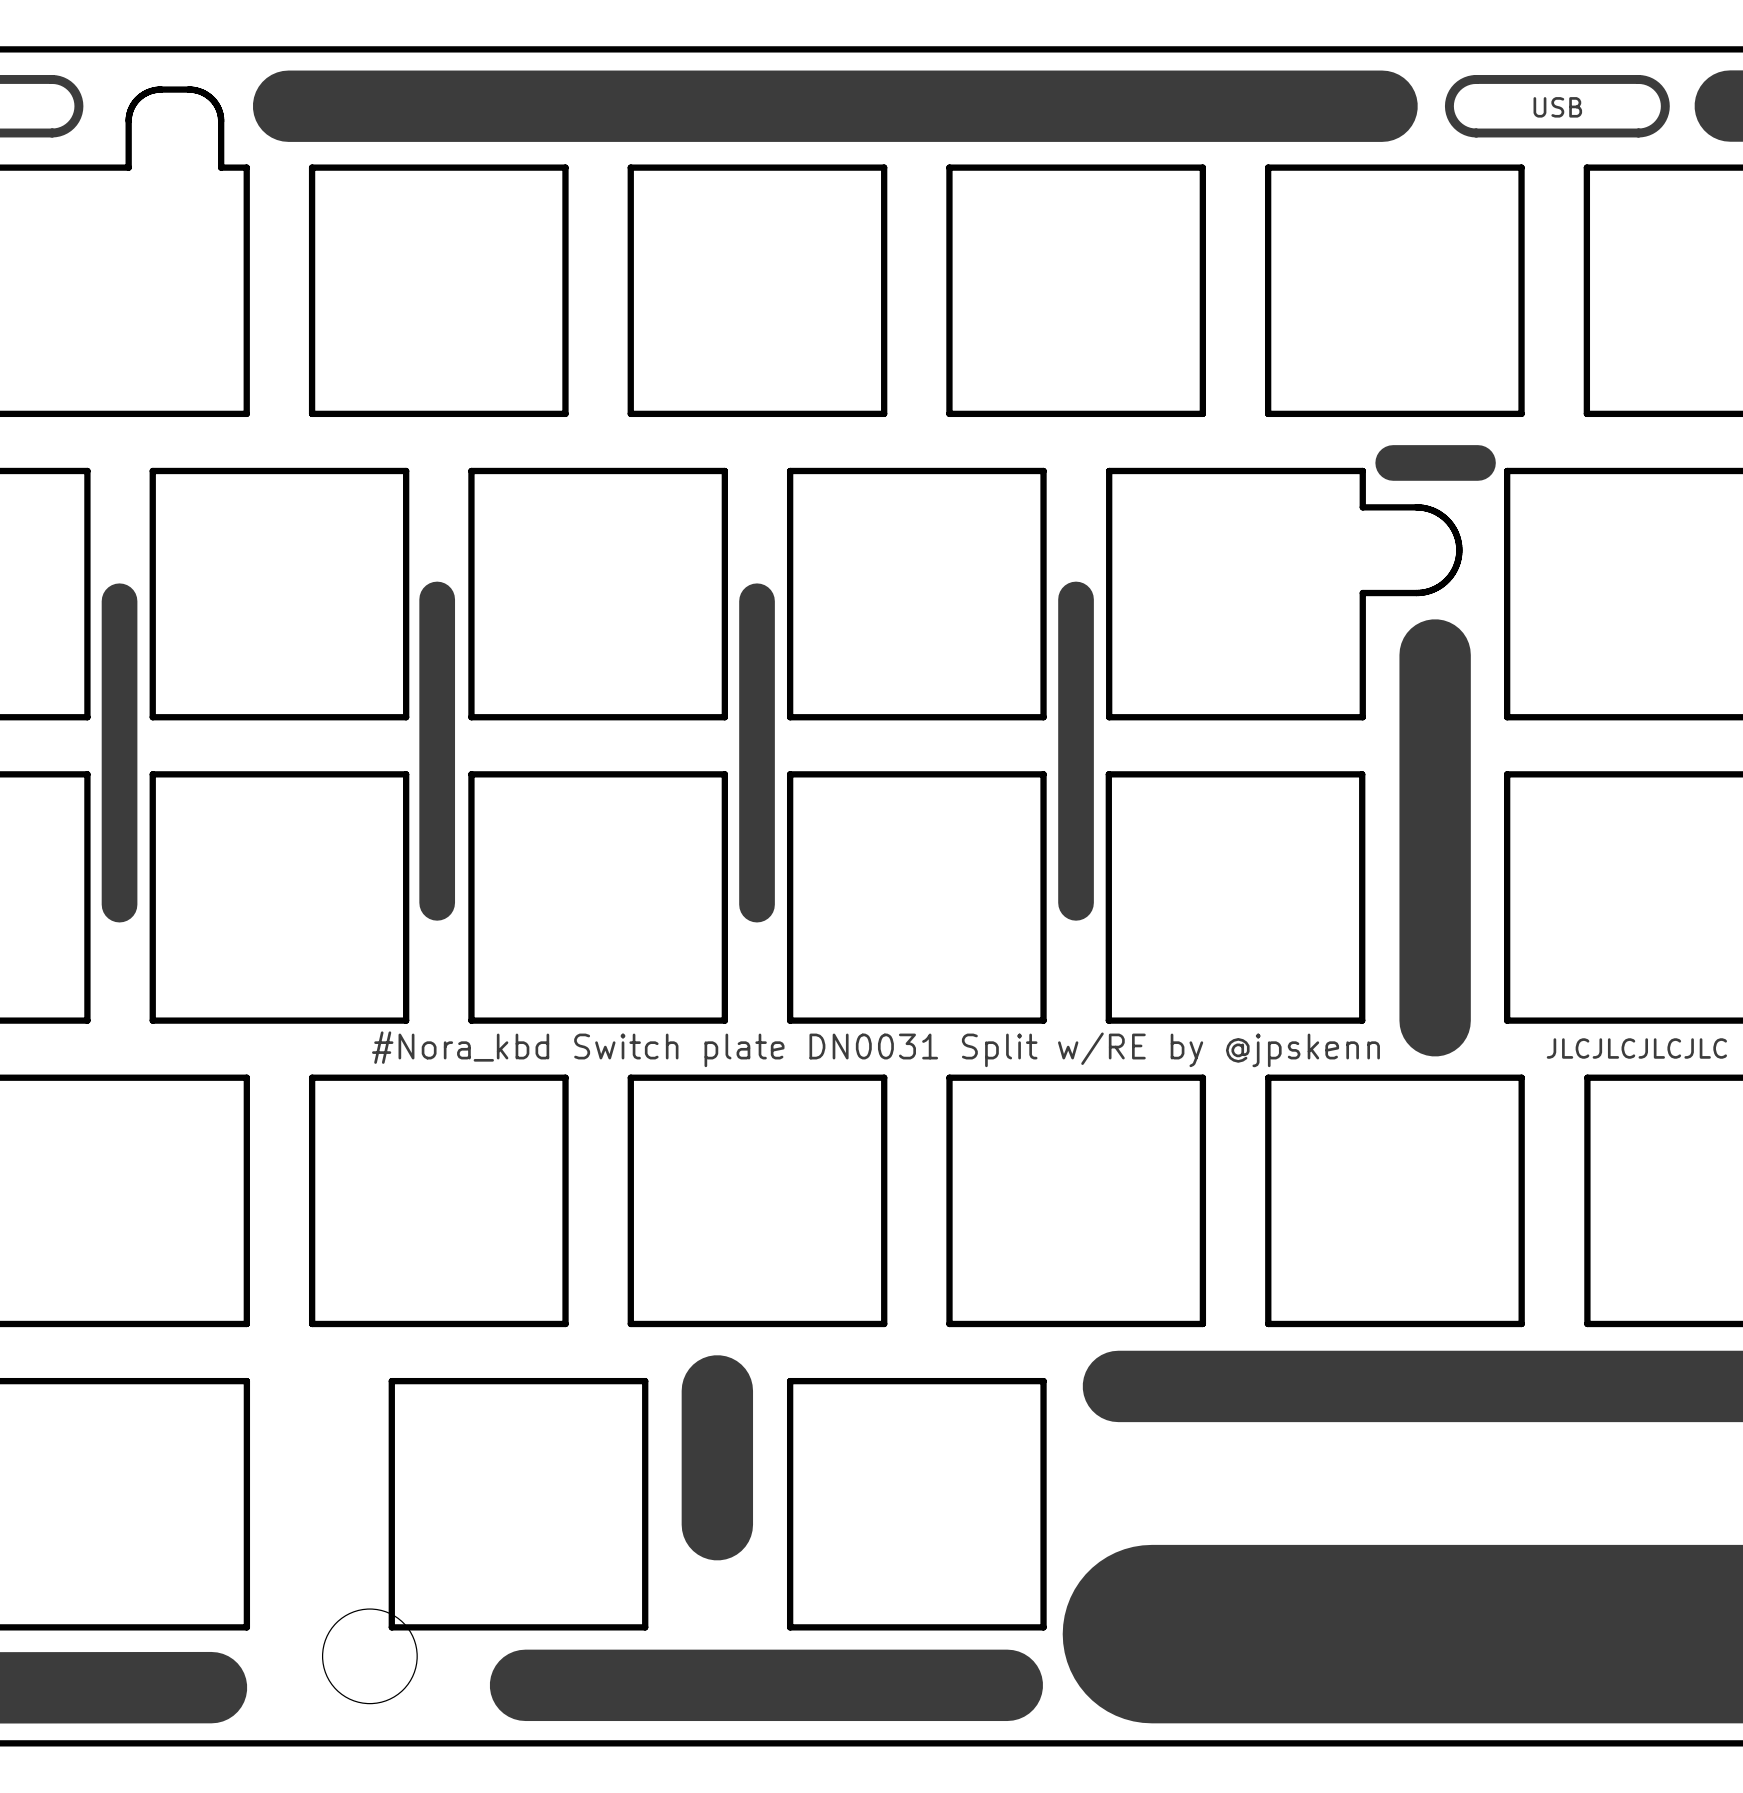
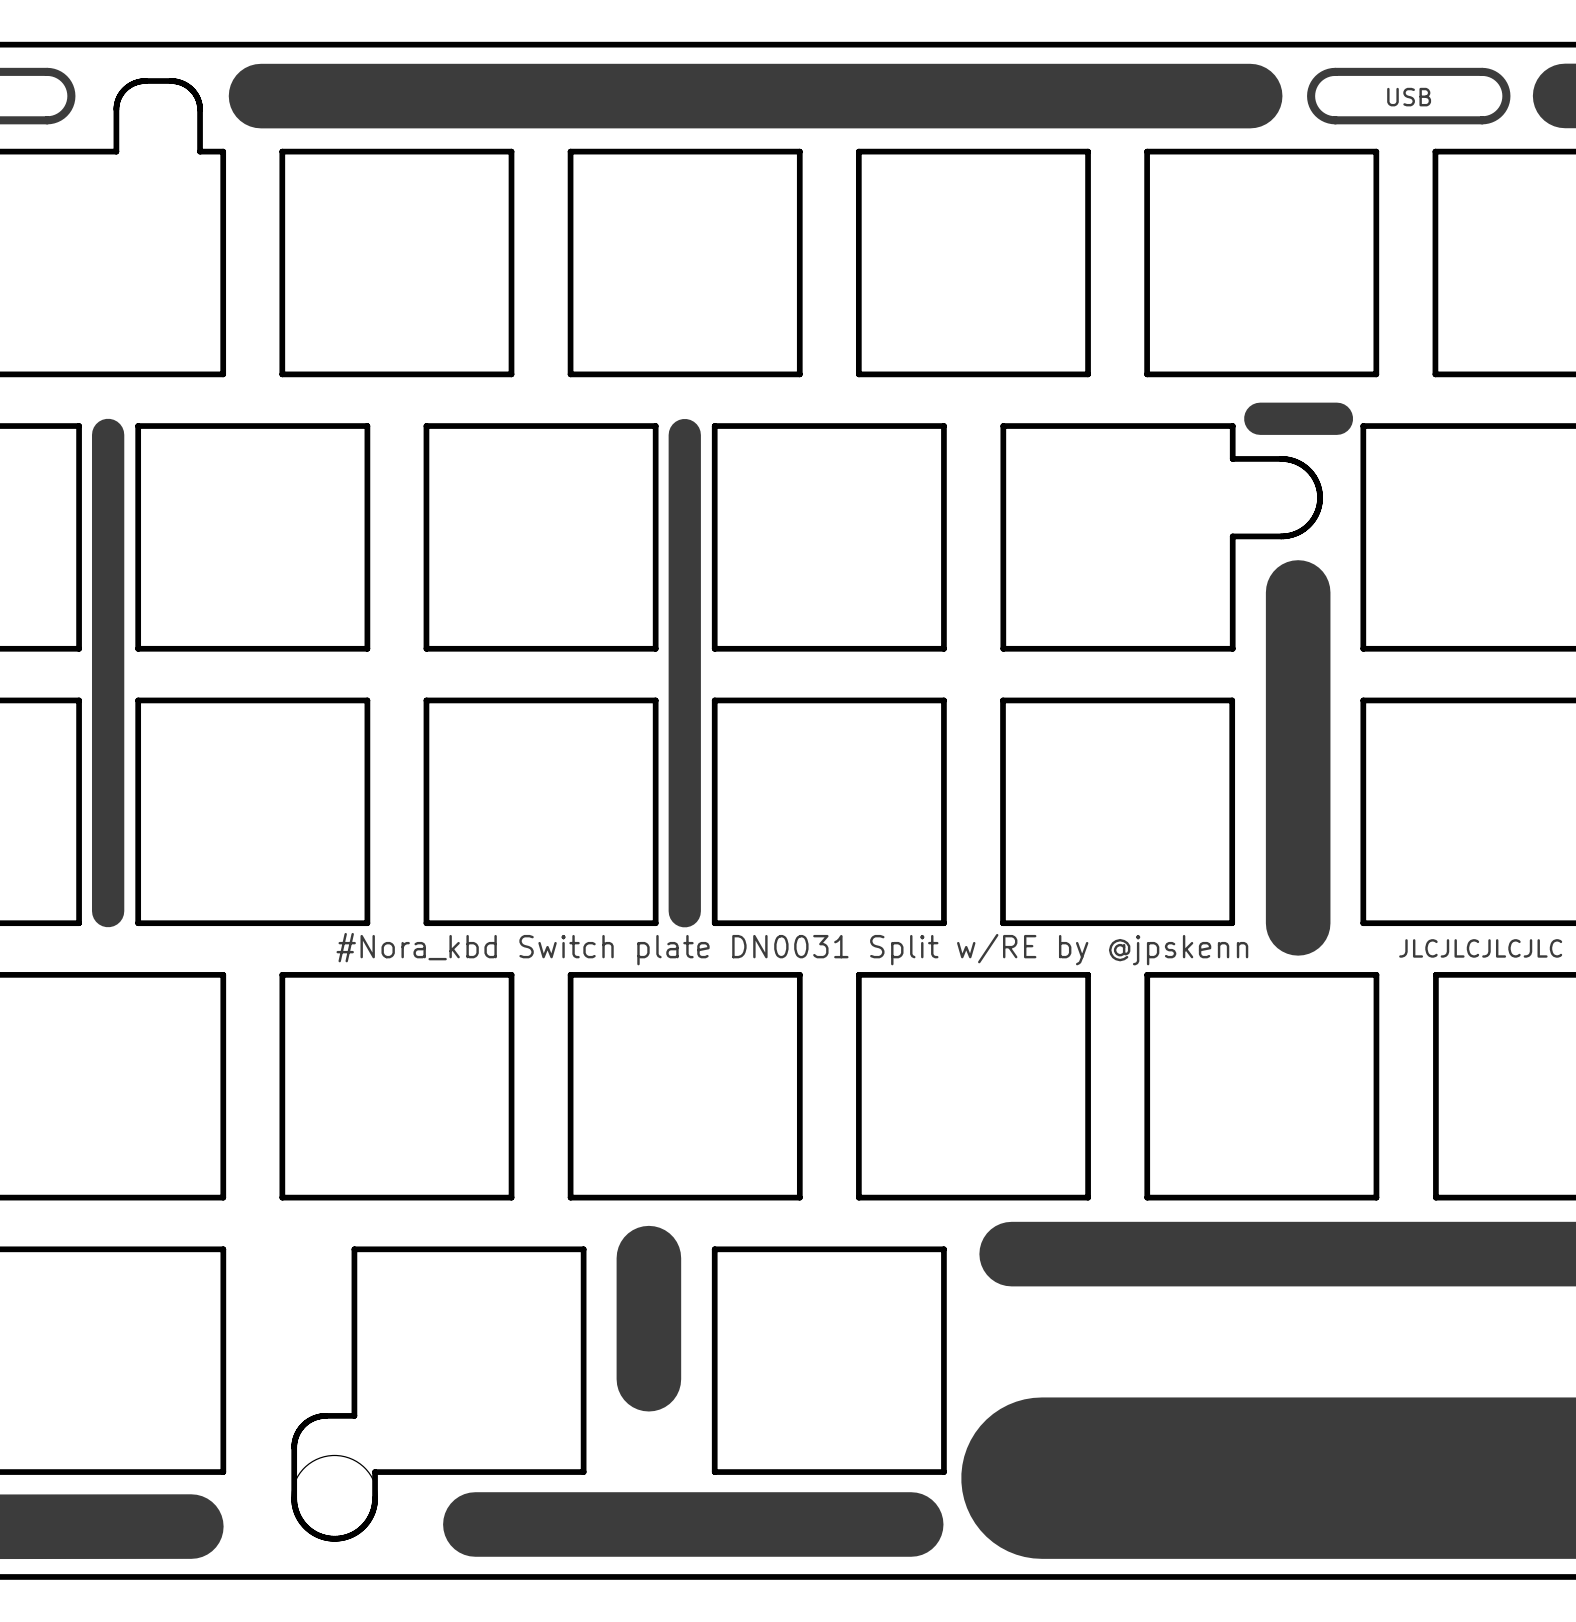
line: none -> (108, 434) (108, 543)
line: none -> (684, 435) (684, 543)
line: (437, 599) (437, 902) -> none
line: (1076, 599) (1076, 902) -> none
line: none -> (108, 818) (108, 911)
line: none -> (684, 818) (684, 911)
board edge: (391, 1565) (391, 1627) (645, 1627) -> (354, 1415) (324, 1415) (313, 1418) (301, 1427) (295, 1439) (294, 1498) (296, 1510) (307, 1528) (324, 1537) (336, 1538) (348, 1536) (358, 1530) (367, 1522) (374, 1504) (375, 1472) (583, 1472)

